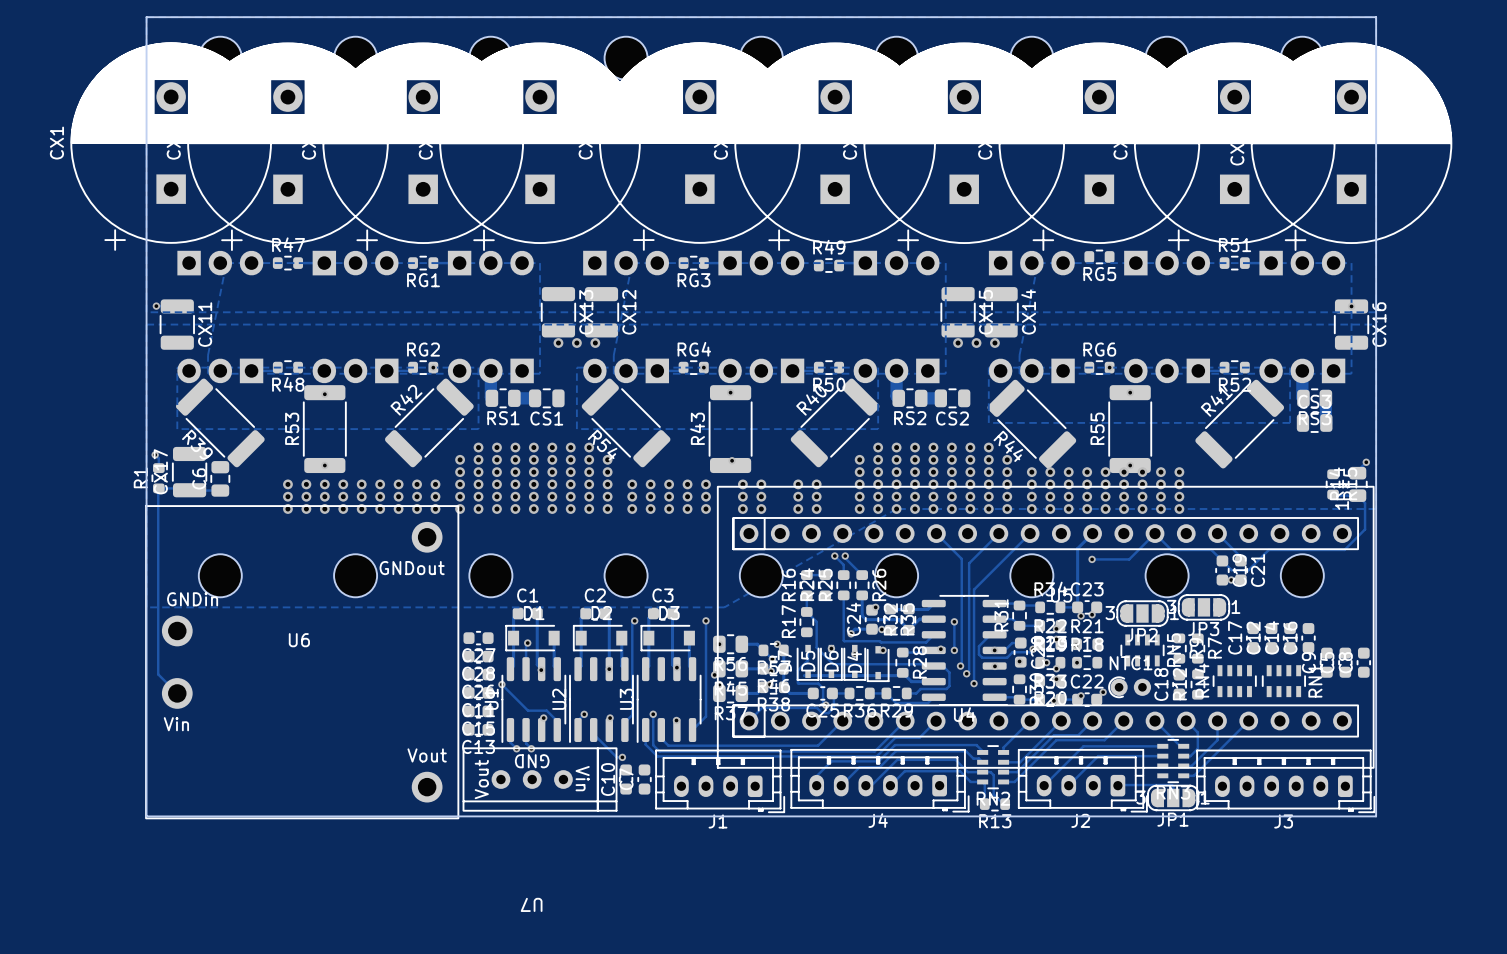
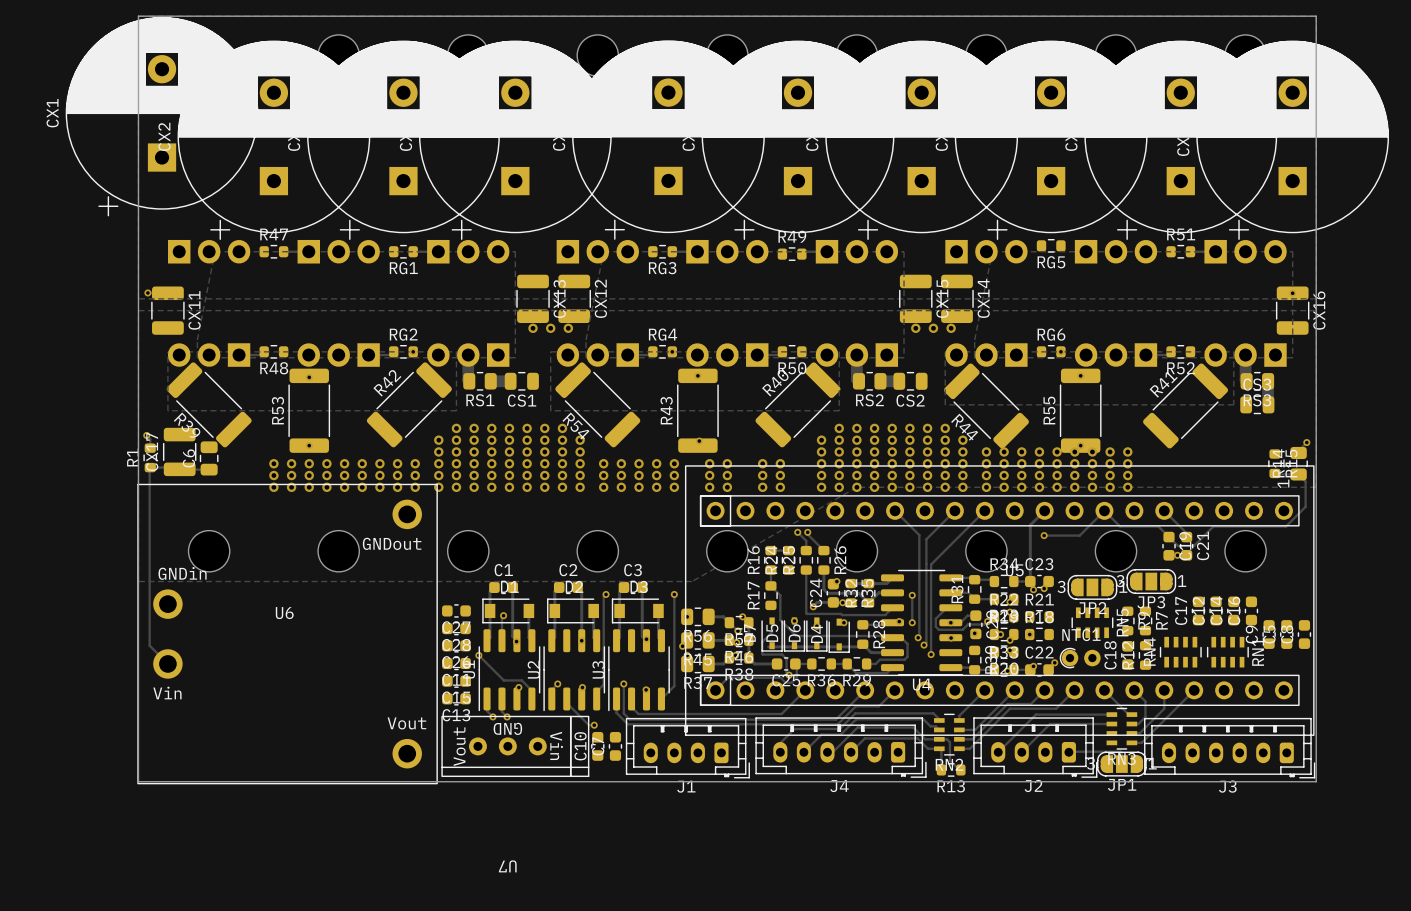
CX1 position: (171, 146) -> (162, 116)

